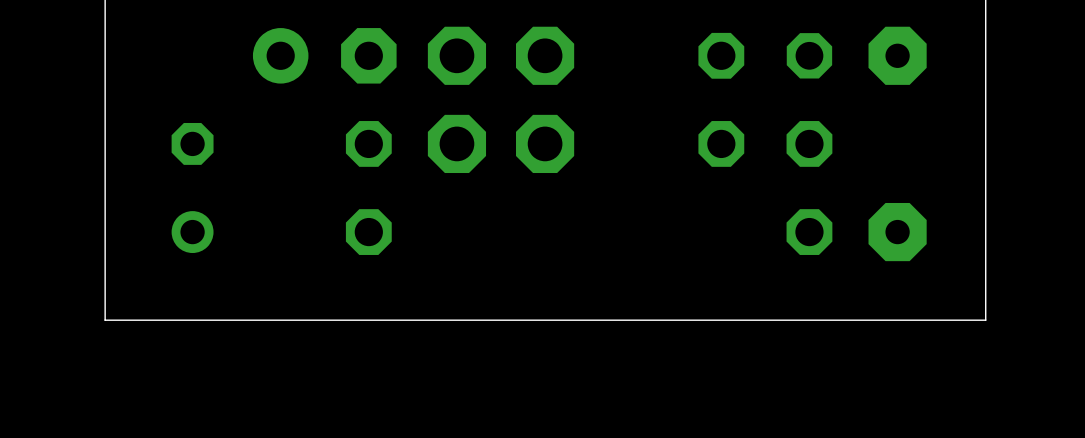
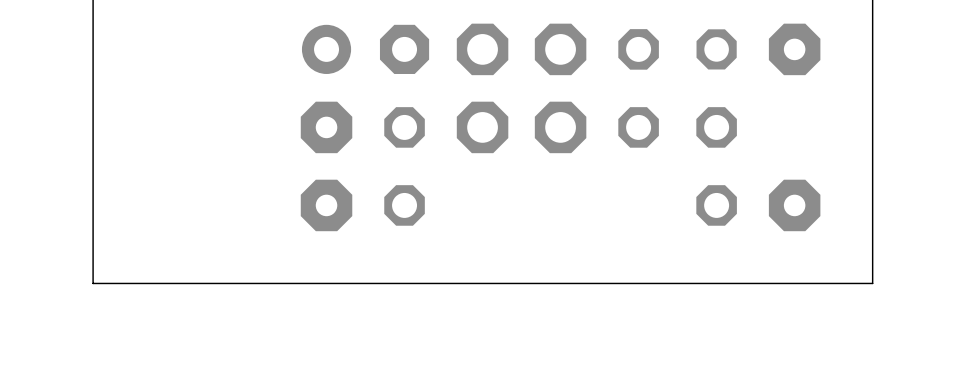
part position: (324, 55) -> (365, 49)
part position: (501, 99) -> (521, 88)
part: none -> (326, 127)
part: (192, 187) -> none
part position: (368, 187) -> (404, 166)
part: none -> (326, 205)

